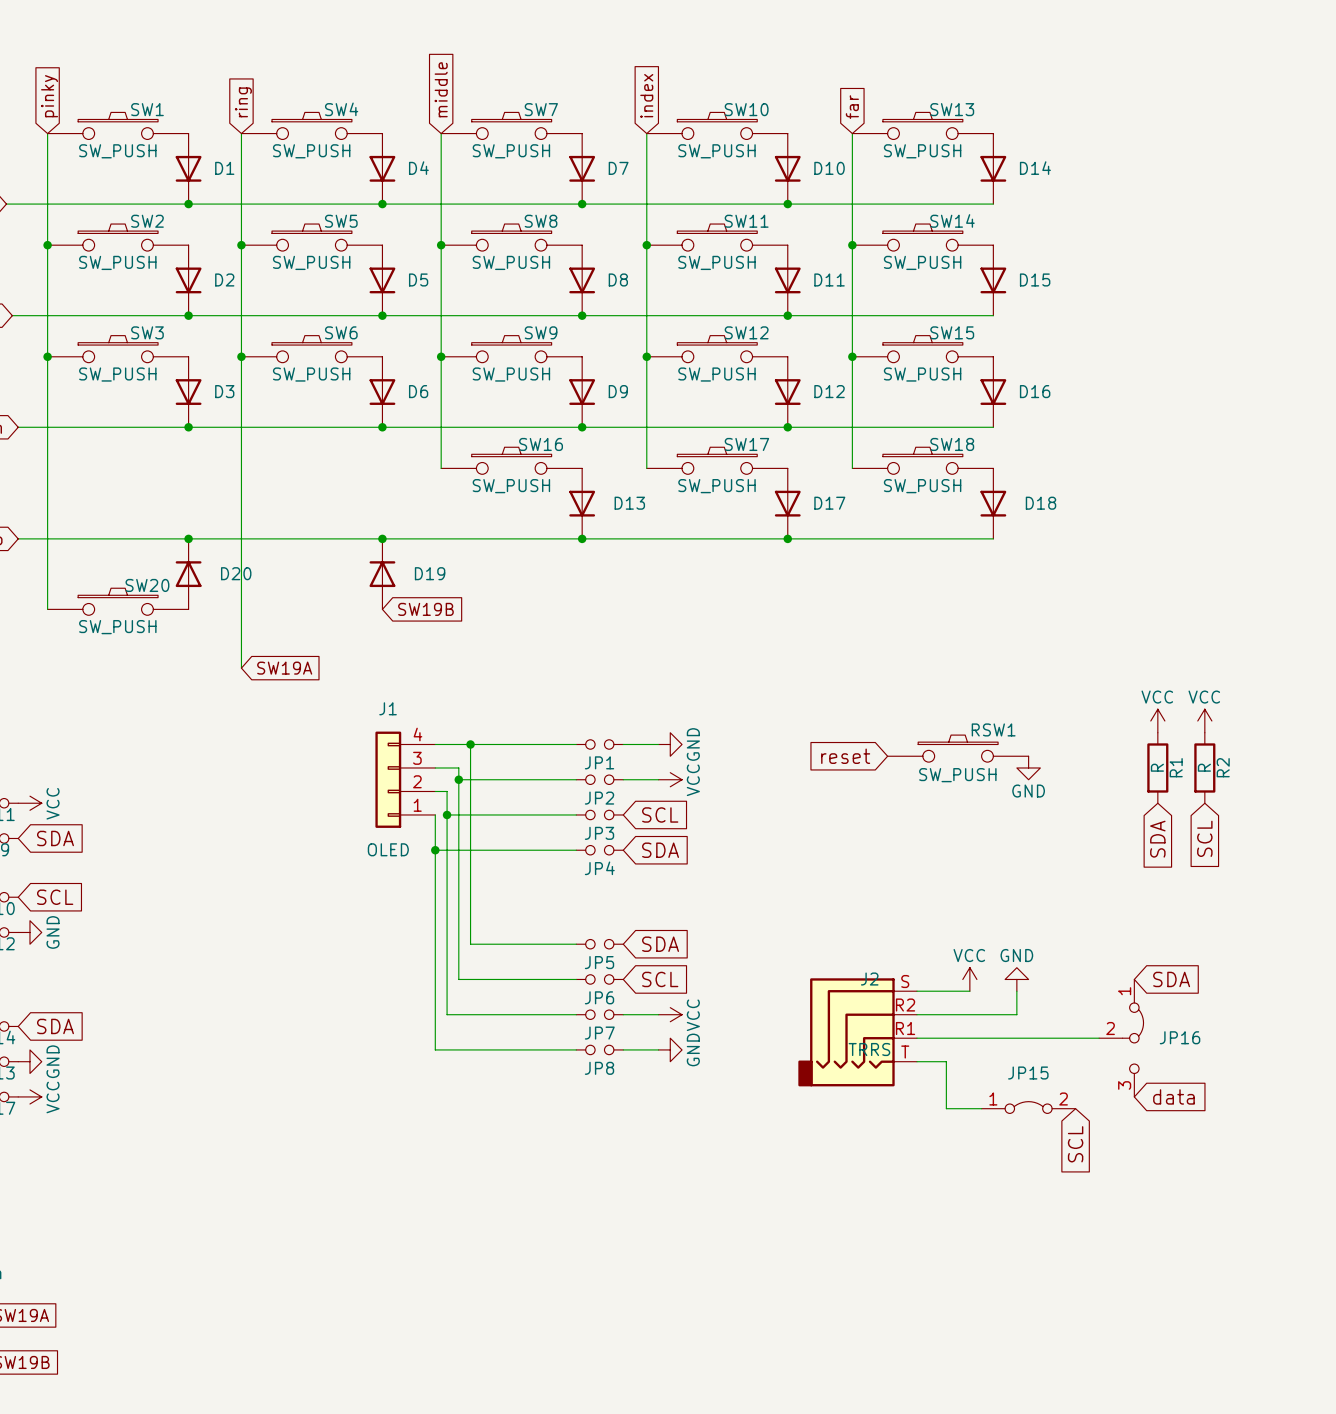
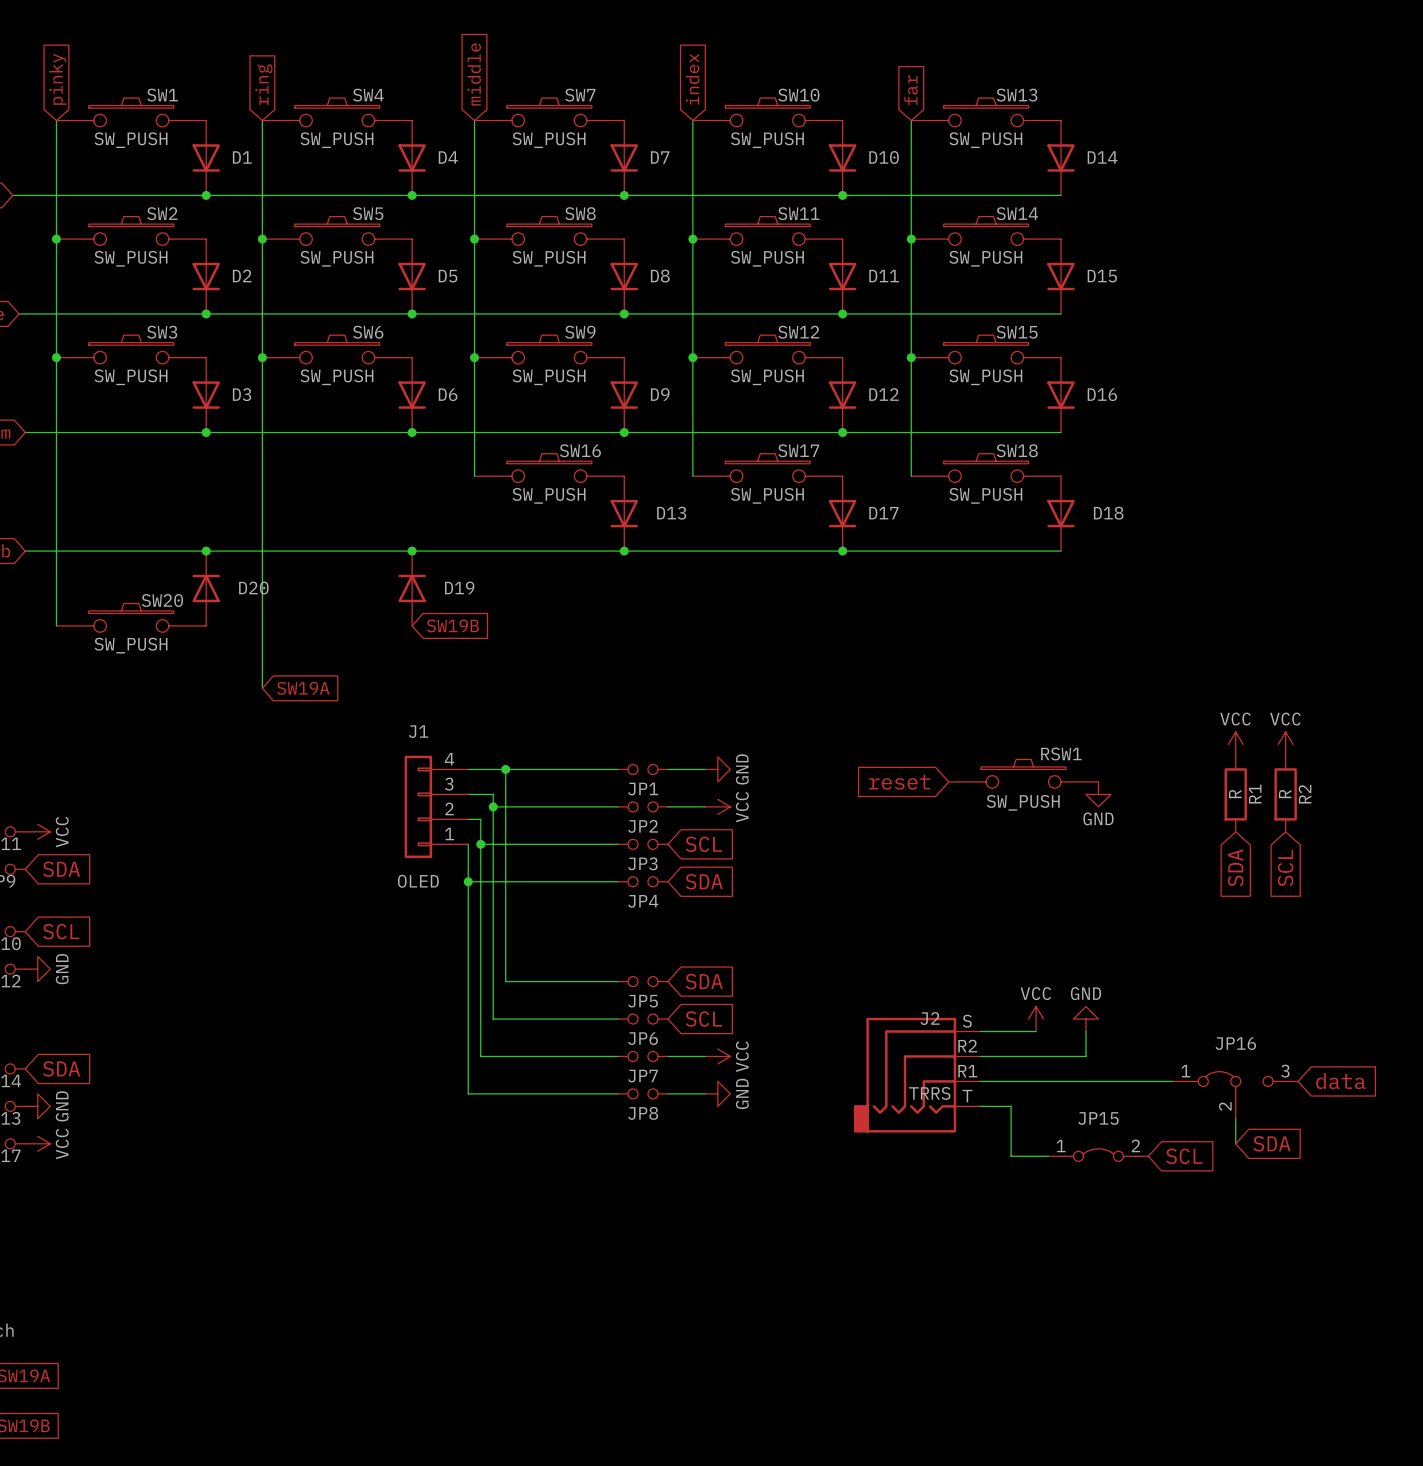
global label position: SDA (1171, 979) -> SDA (1272, 1143)
JP16 rotation: 0° (1133, 1038) -> 90° counterclockwise (1235, 1082)
wire: none -> (1235, 1118) (1235, 1143)
global label position: data (1173, 1096) -> data (1340, 1081)
global label rotation: 0° (1075, 1144) -> 90° counterclockwise (1184, 1156)

